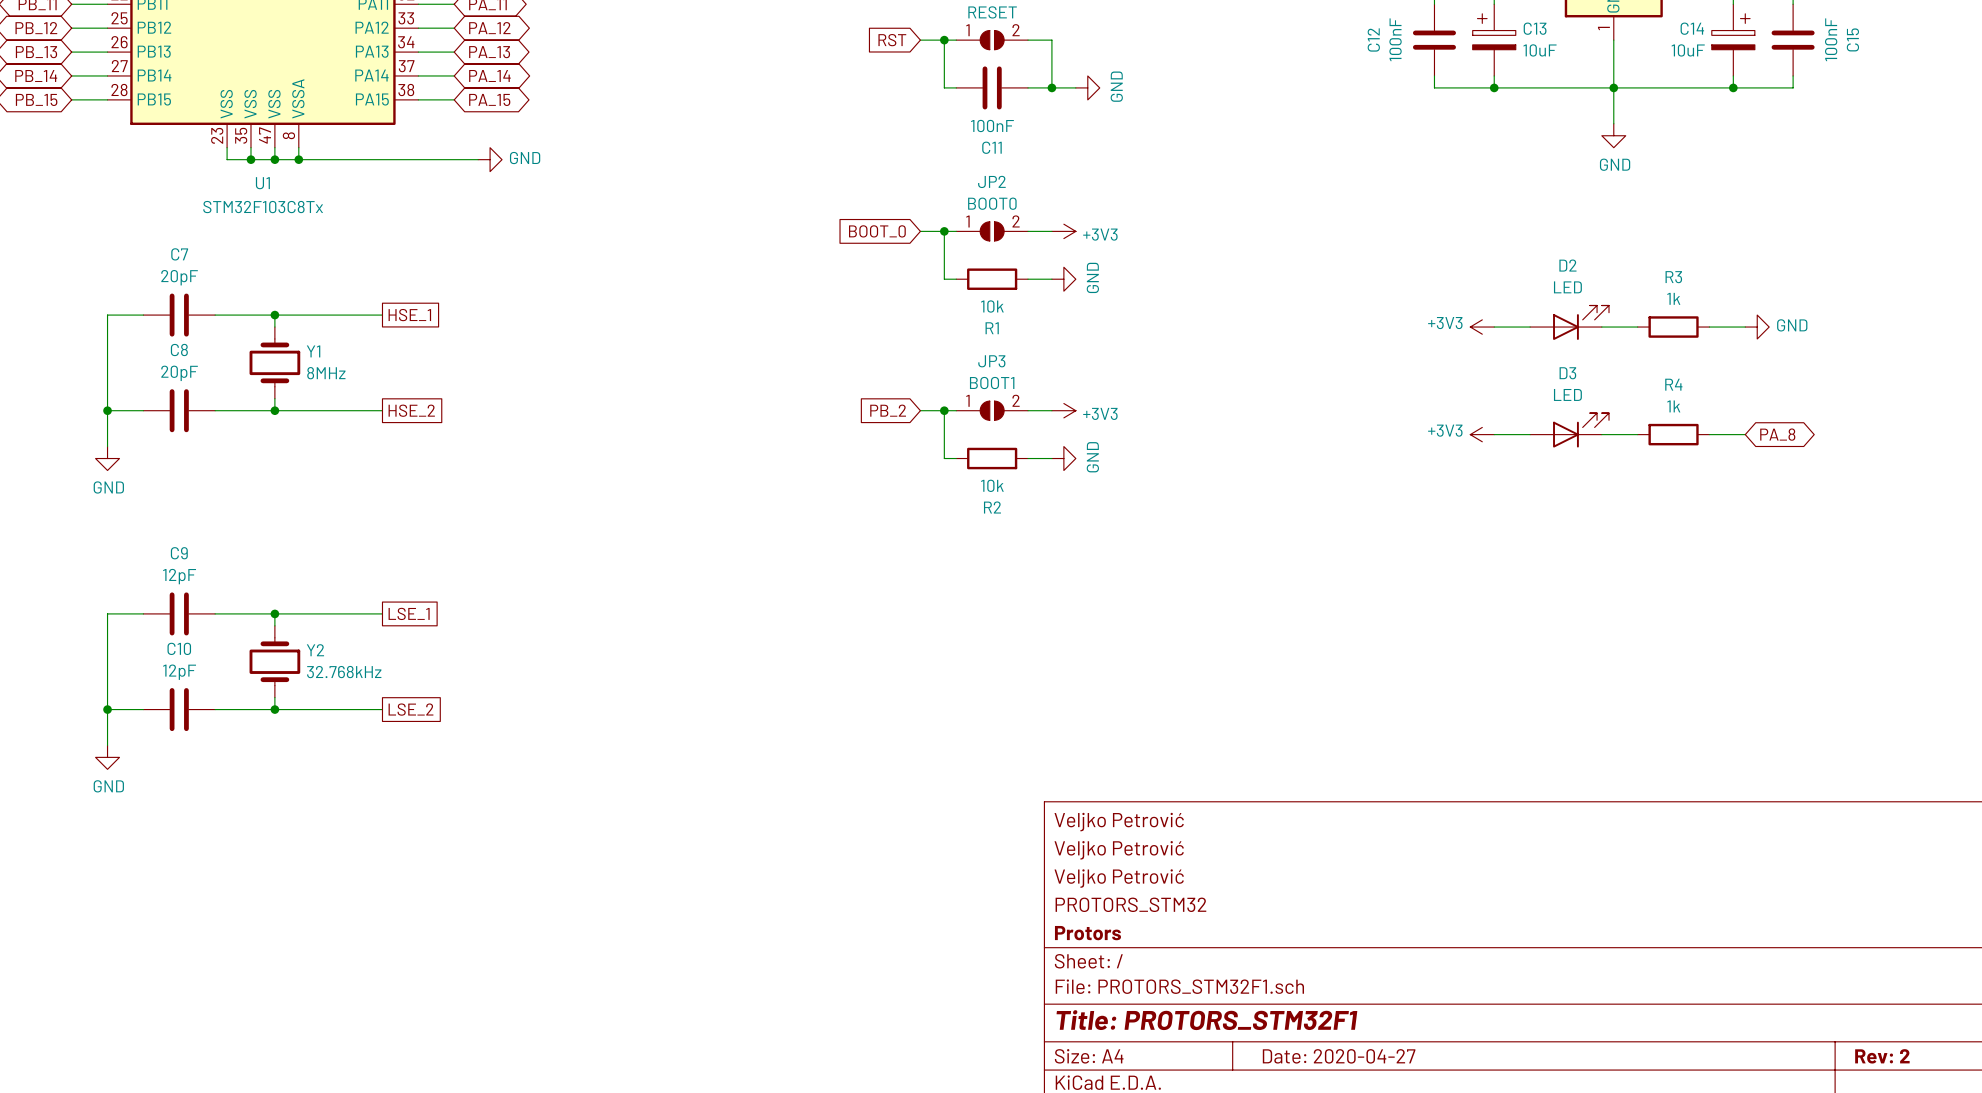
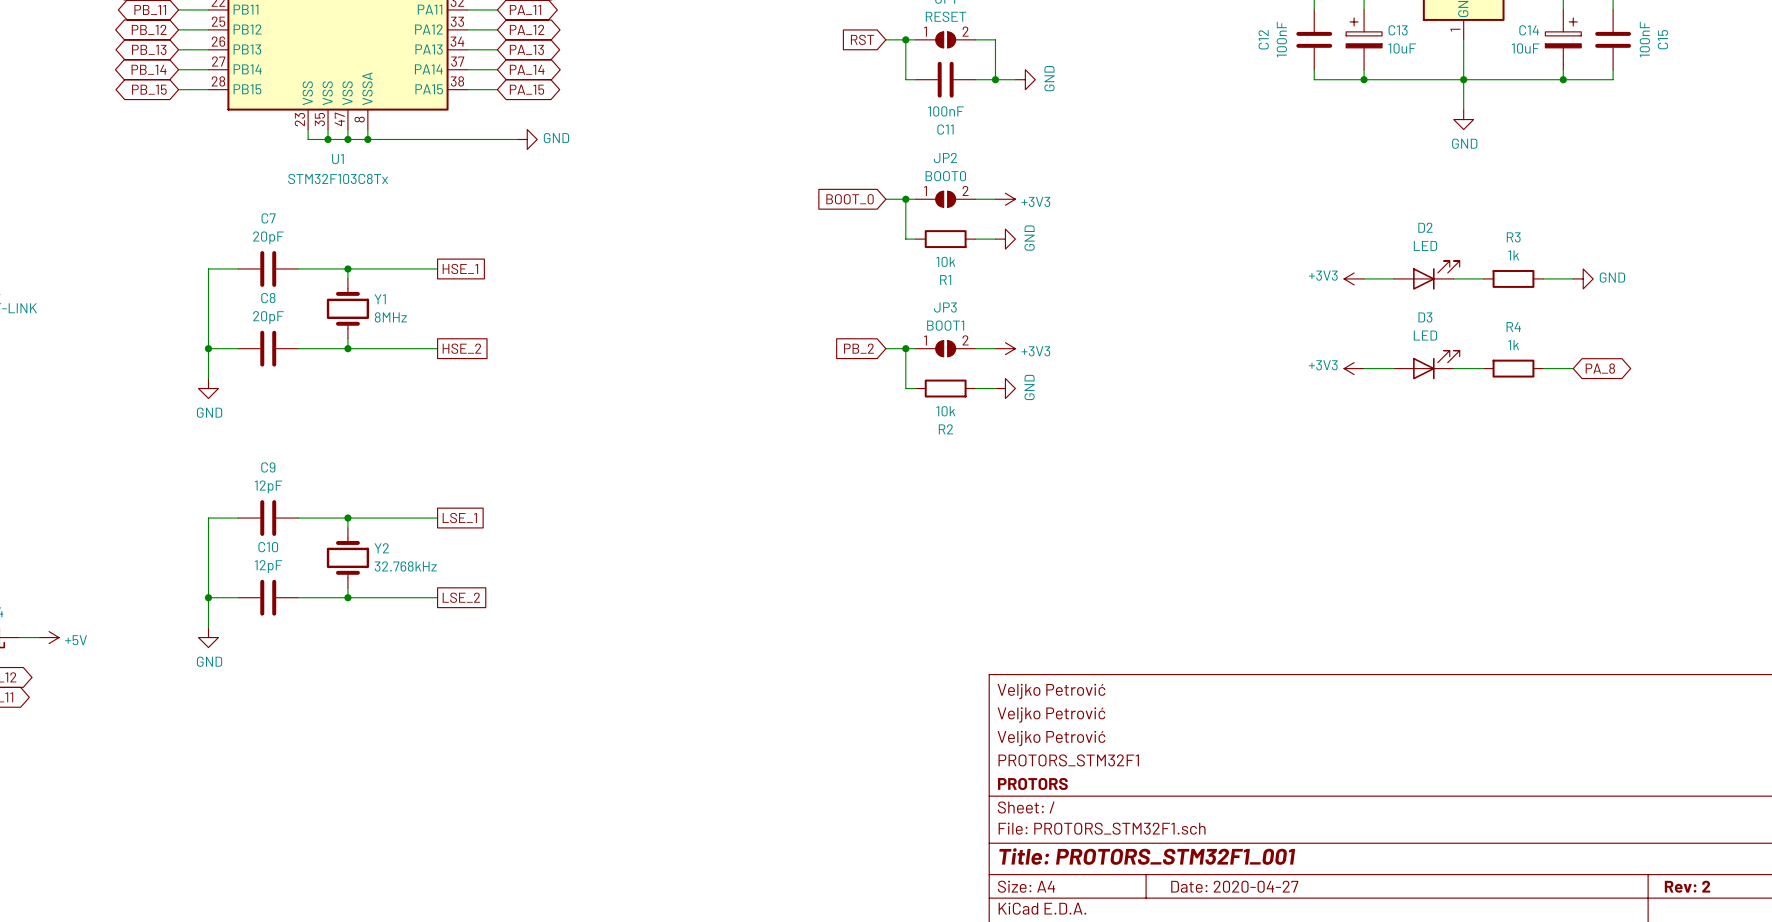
title block: PROTORS_STM32 (1130, 904) -> PROTORS_STM32F1 (1068, 760)
title block: Protors (1087, 933) -> PROTORS (1032, 783)
title block: Title: PROTORS_STM32F1 (1206, 1020) -> Title: PROTORS_STM32F1_001 (1147, 856)

